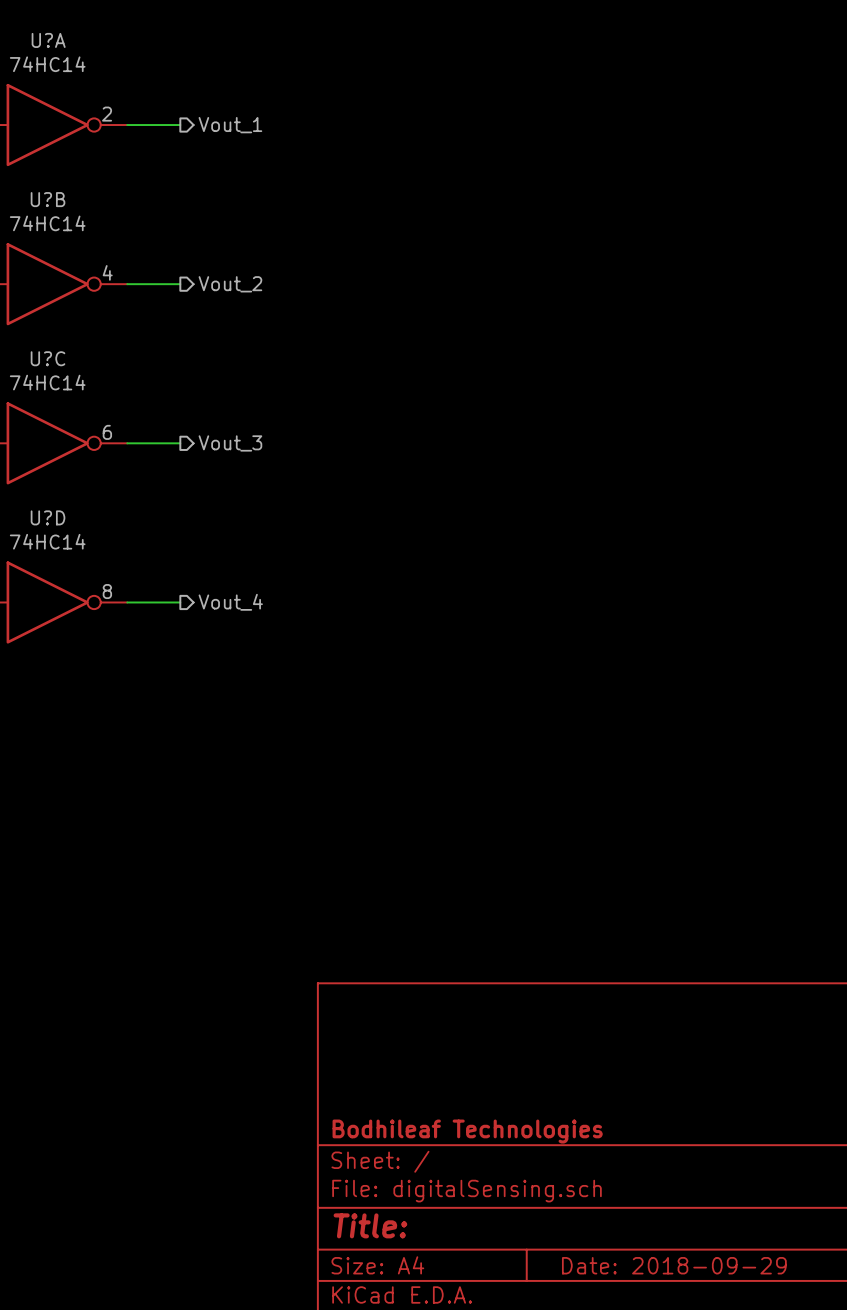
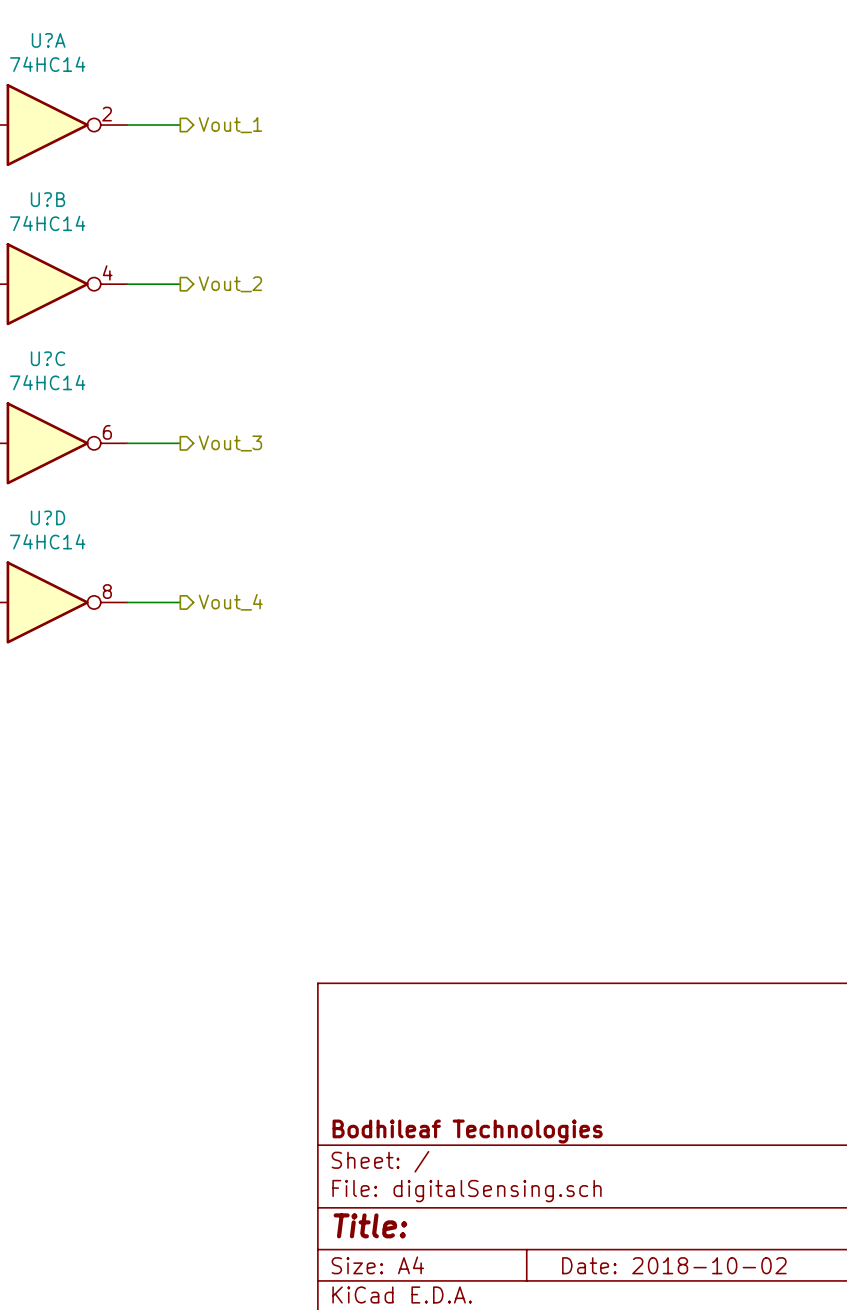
title block: Date: 2018-09-29 (674, 1265) -> Date: 2018-10-02 (674, 1265)

